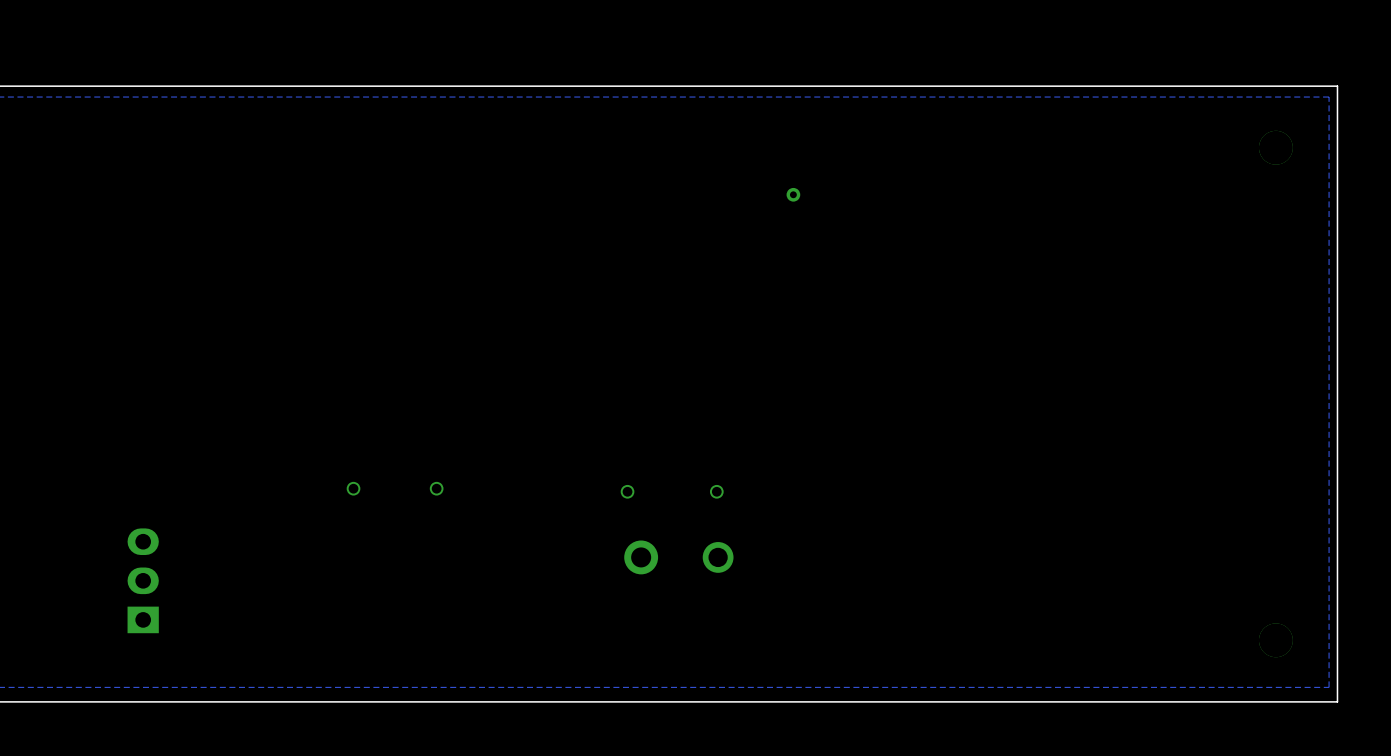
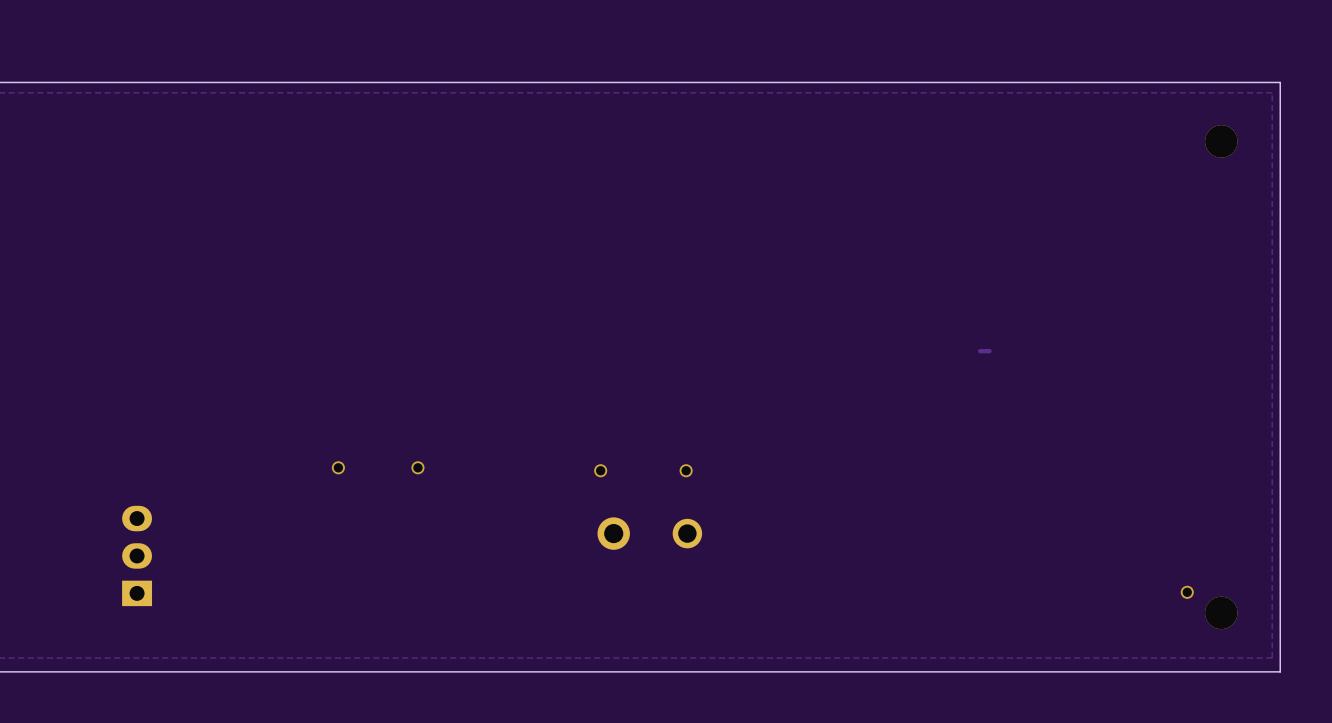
via: (793, 194) -> none
track: none -> (989, 351) (980, 351)
via: none -> (1187, 592)

